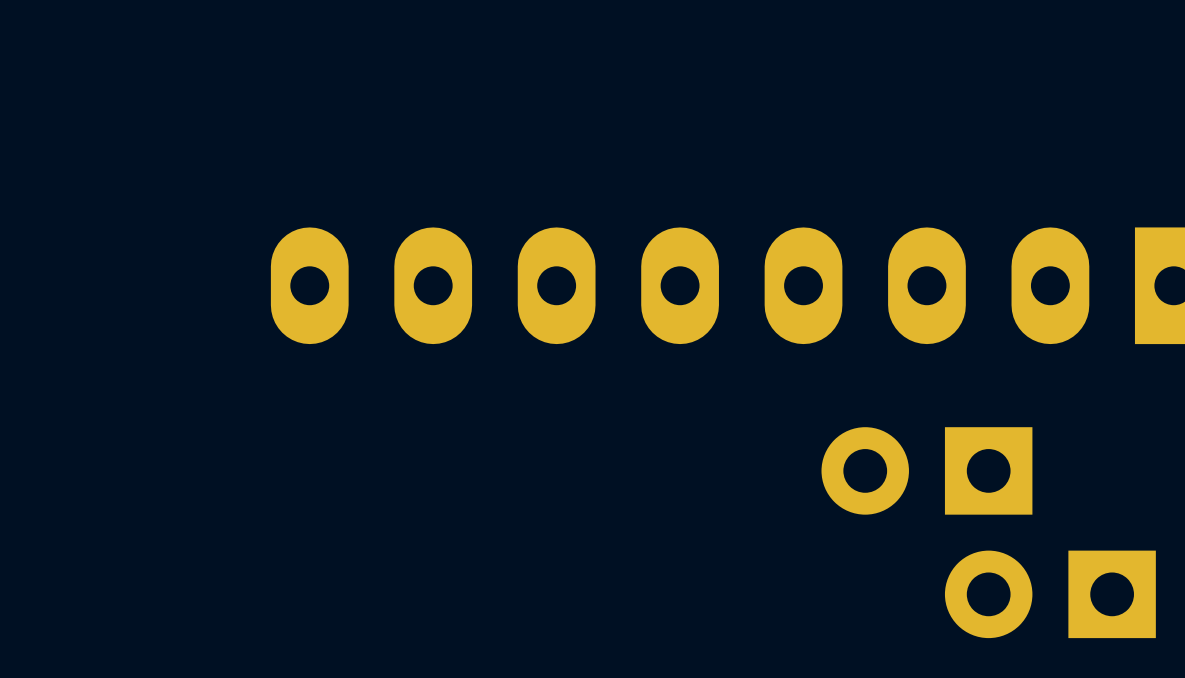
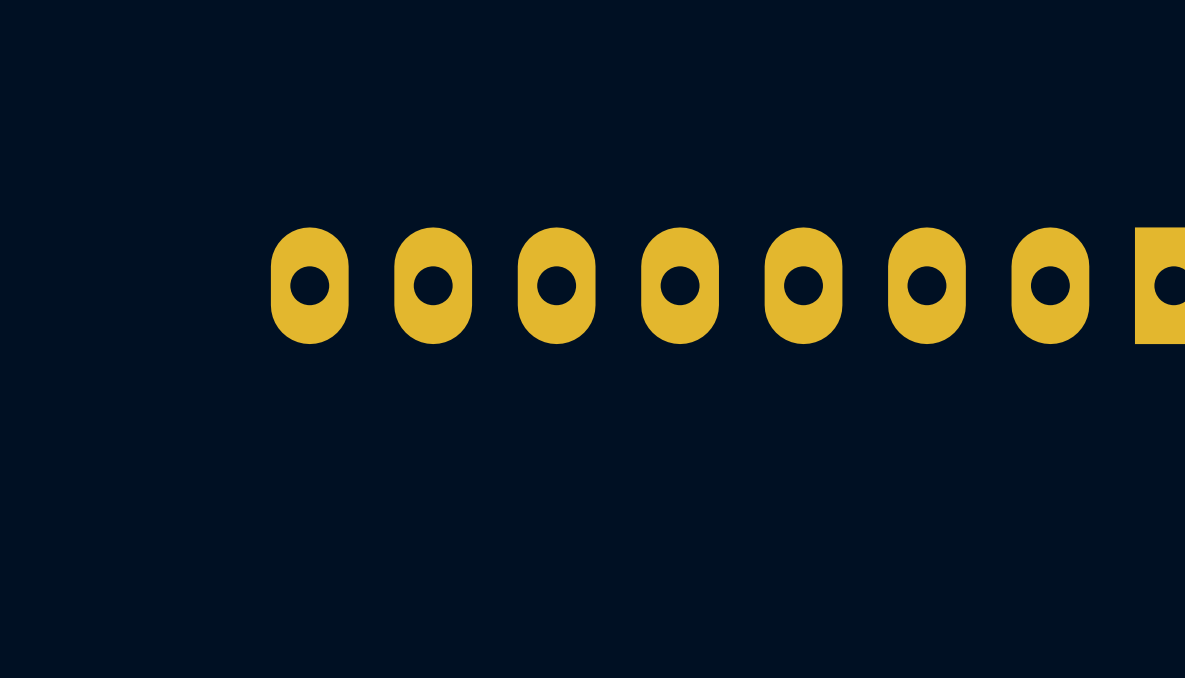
part: (926, 470) -> none
part: (1050, 594) -> none

